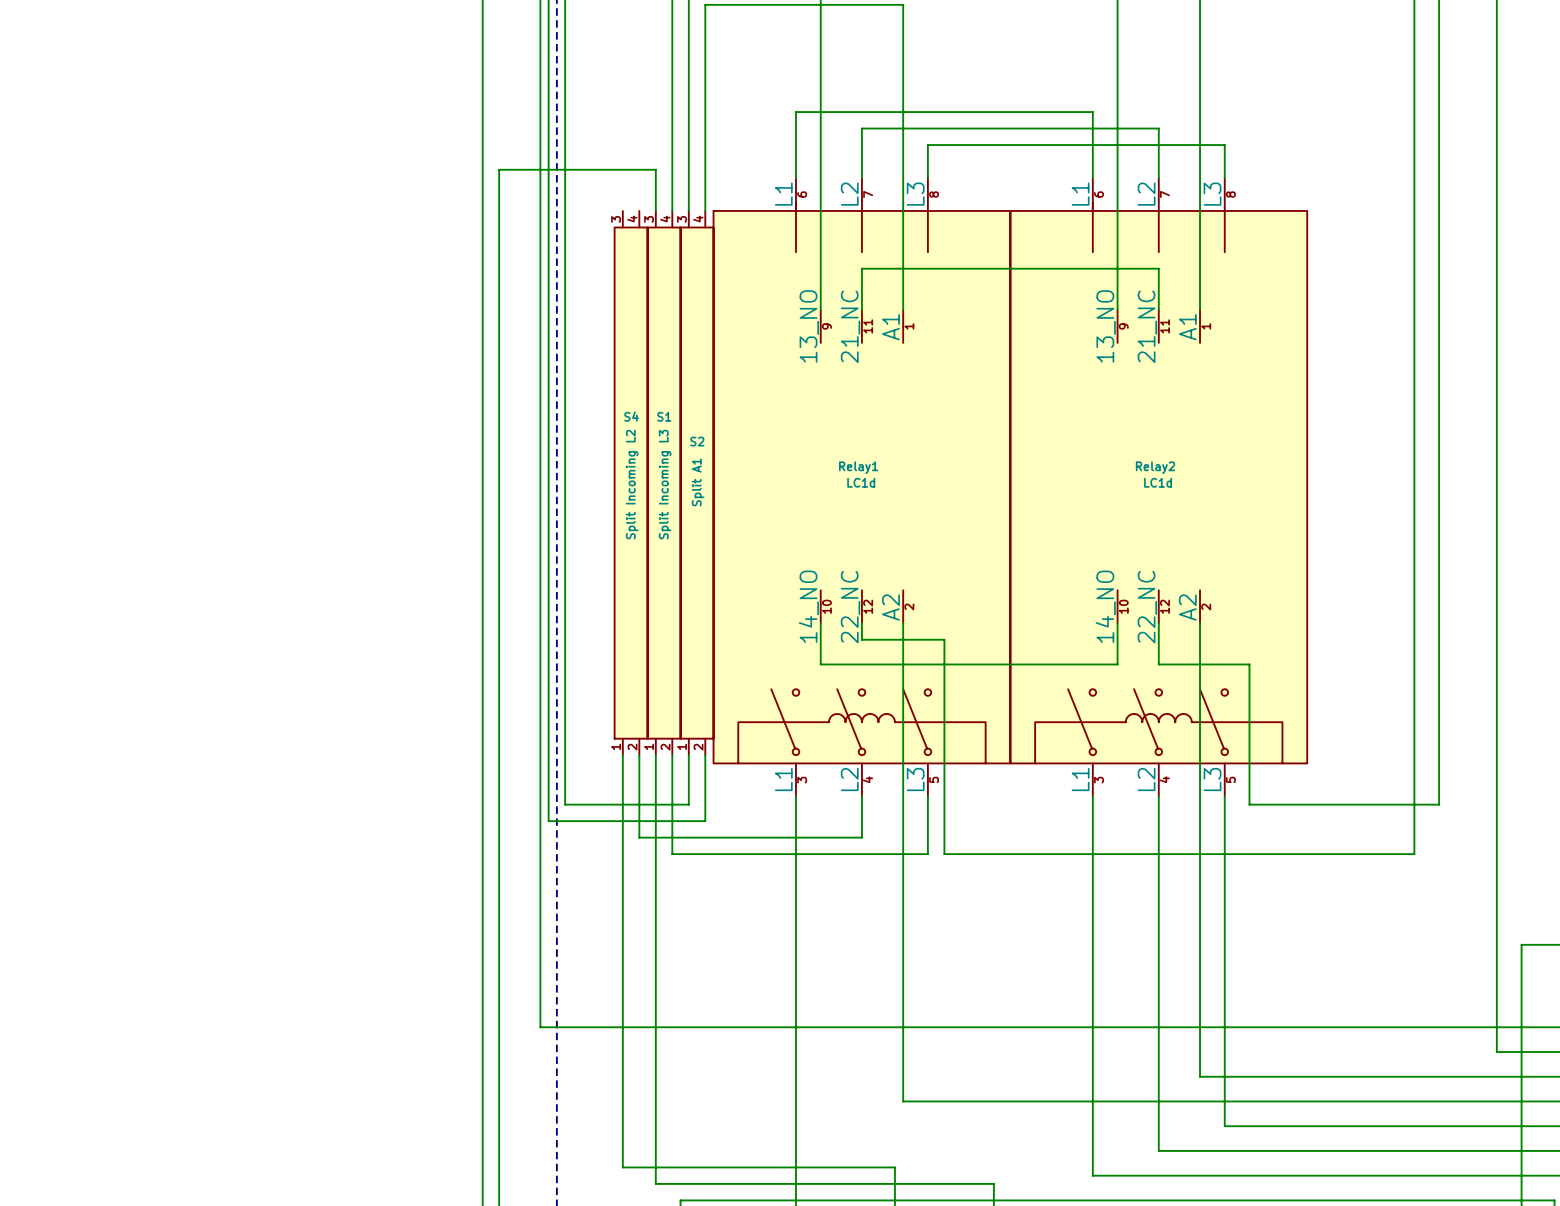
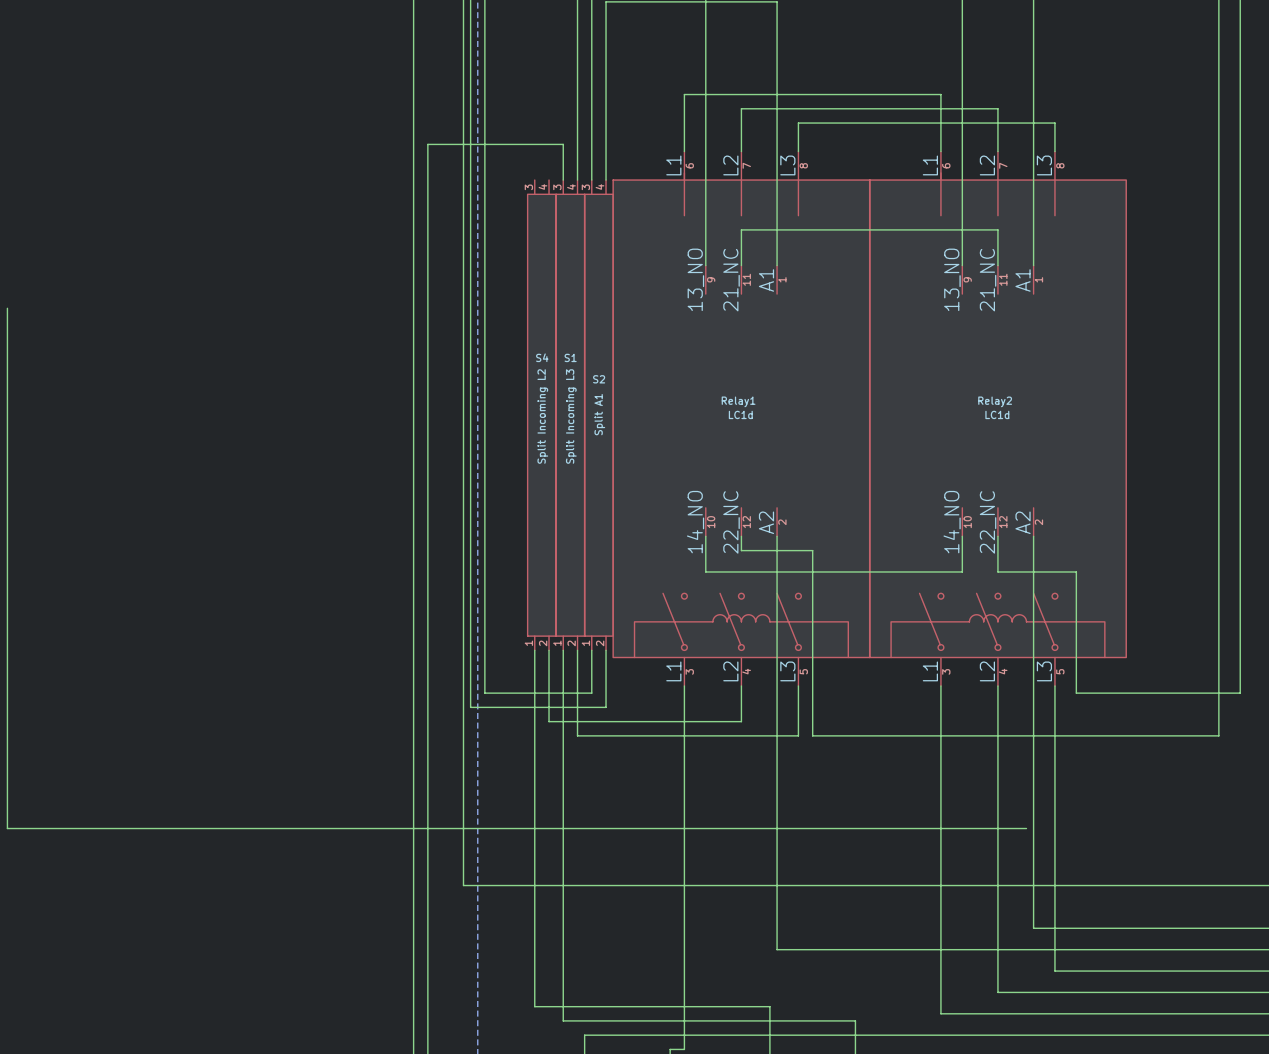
wire: none -> (7, 308) (7, 828) (1026, 828)

